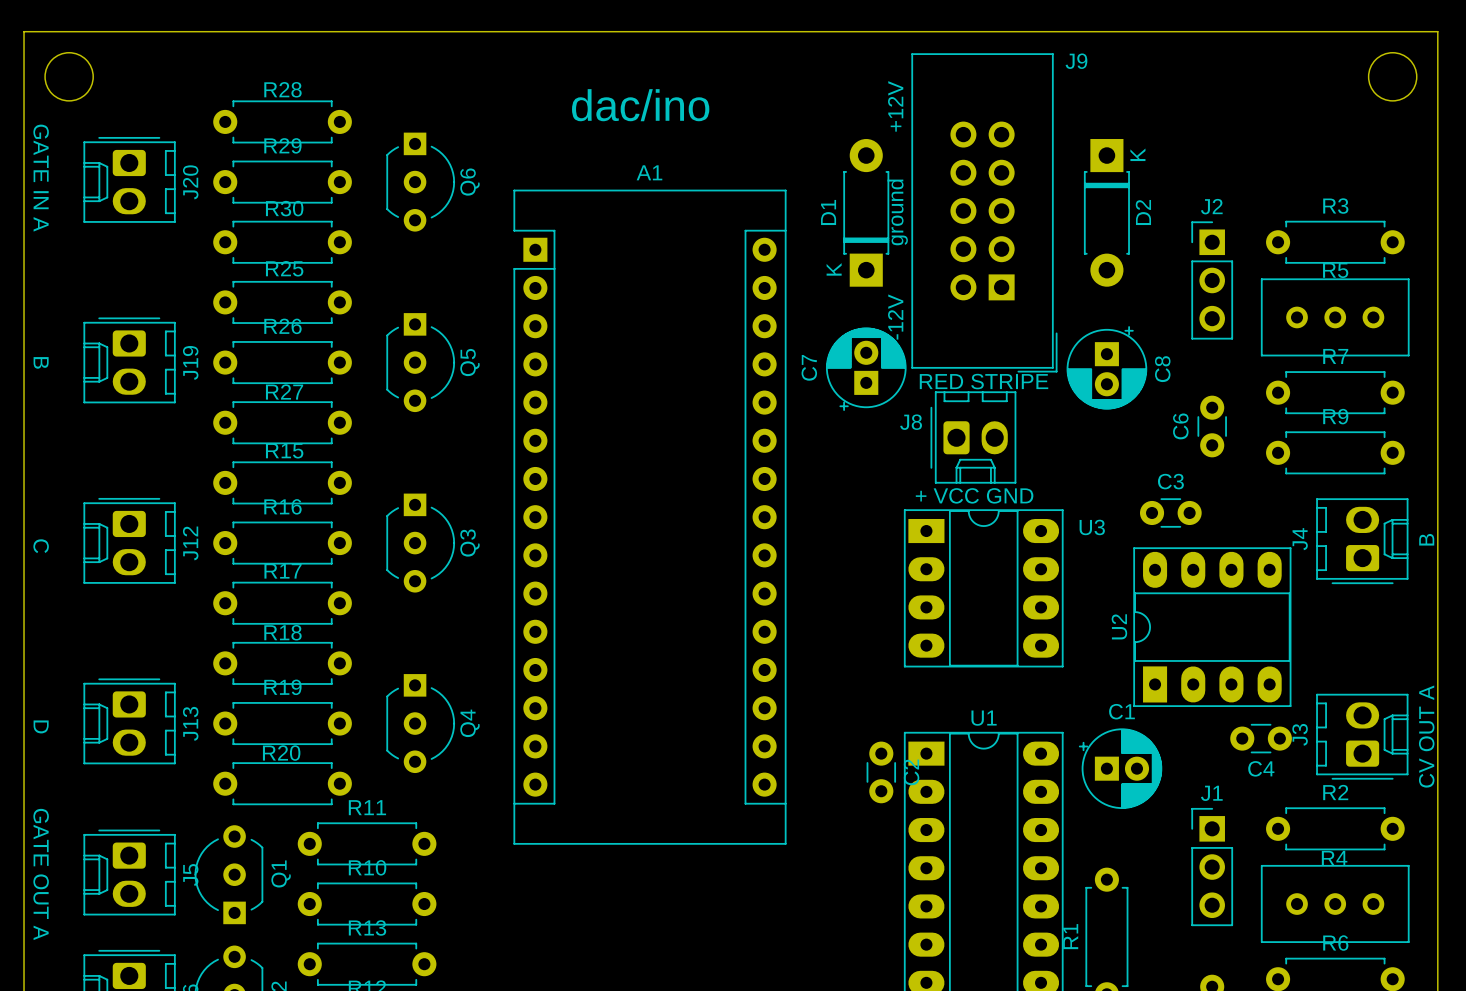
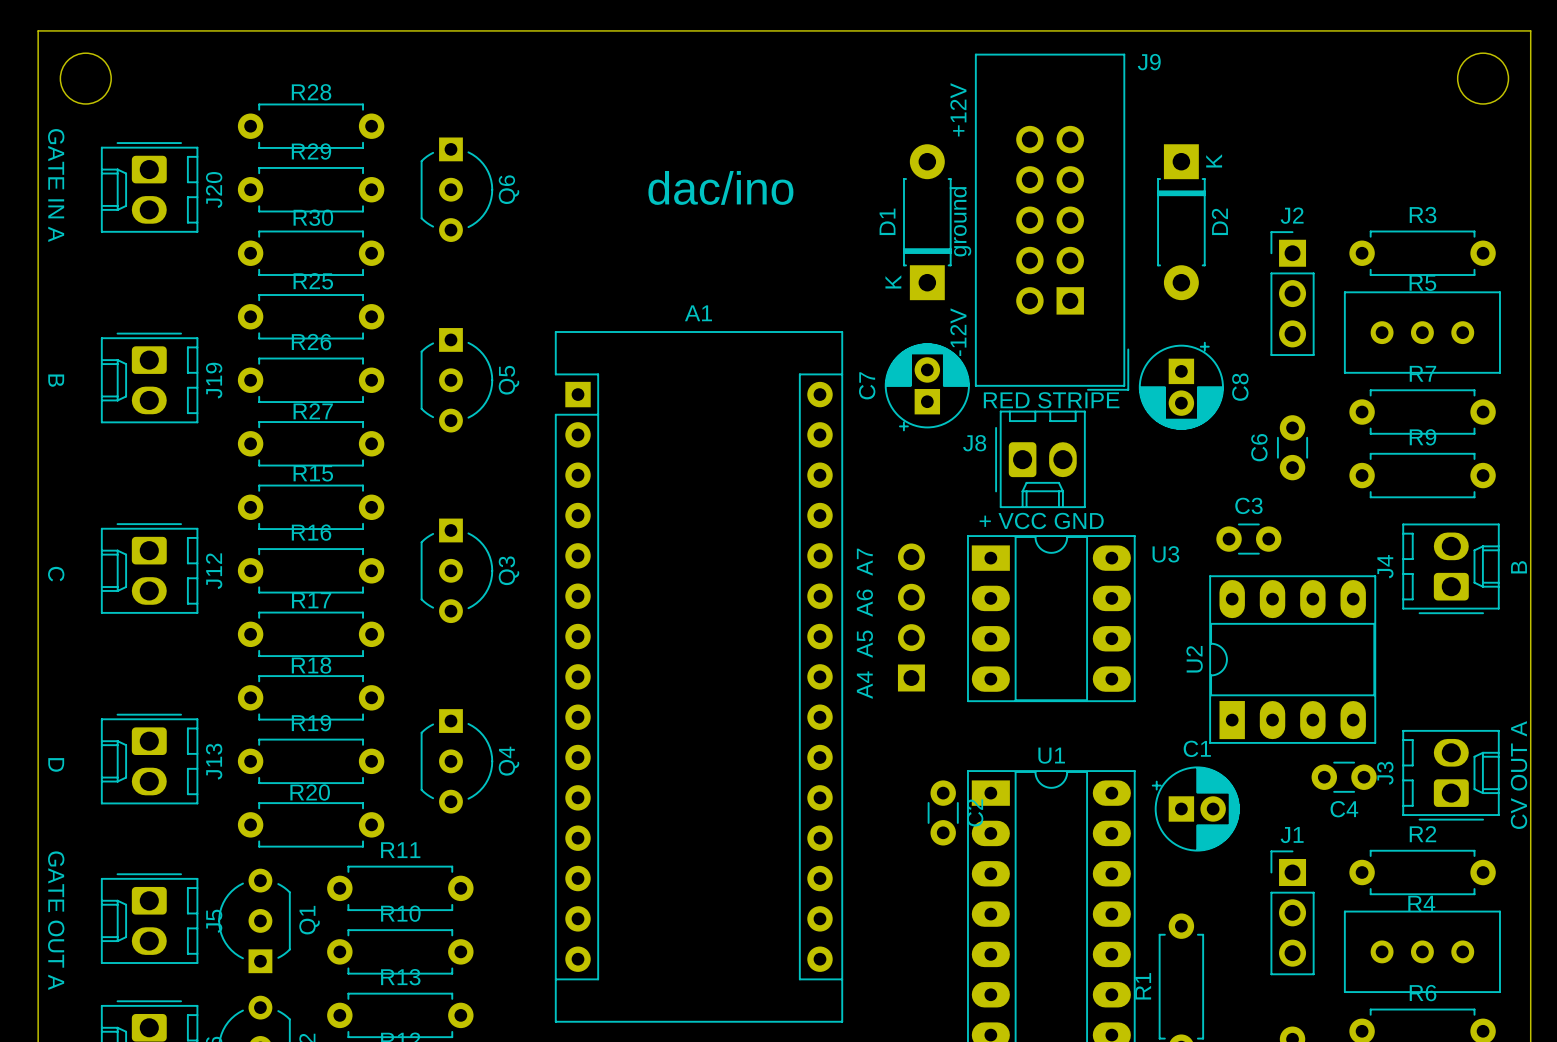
text position: dac/ino (640, 105) -> dac/ino (720, 187)
A1 position: (649, 517) -> (699, 676)
part: none -> (911, 617)
text: none -> A4 A5 A6 A7 (864, 623)

